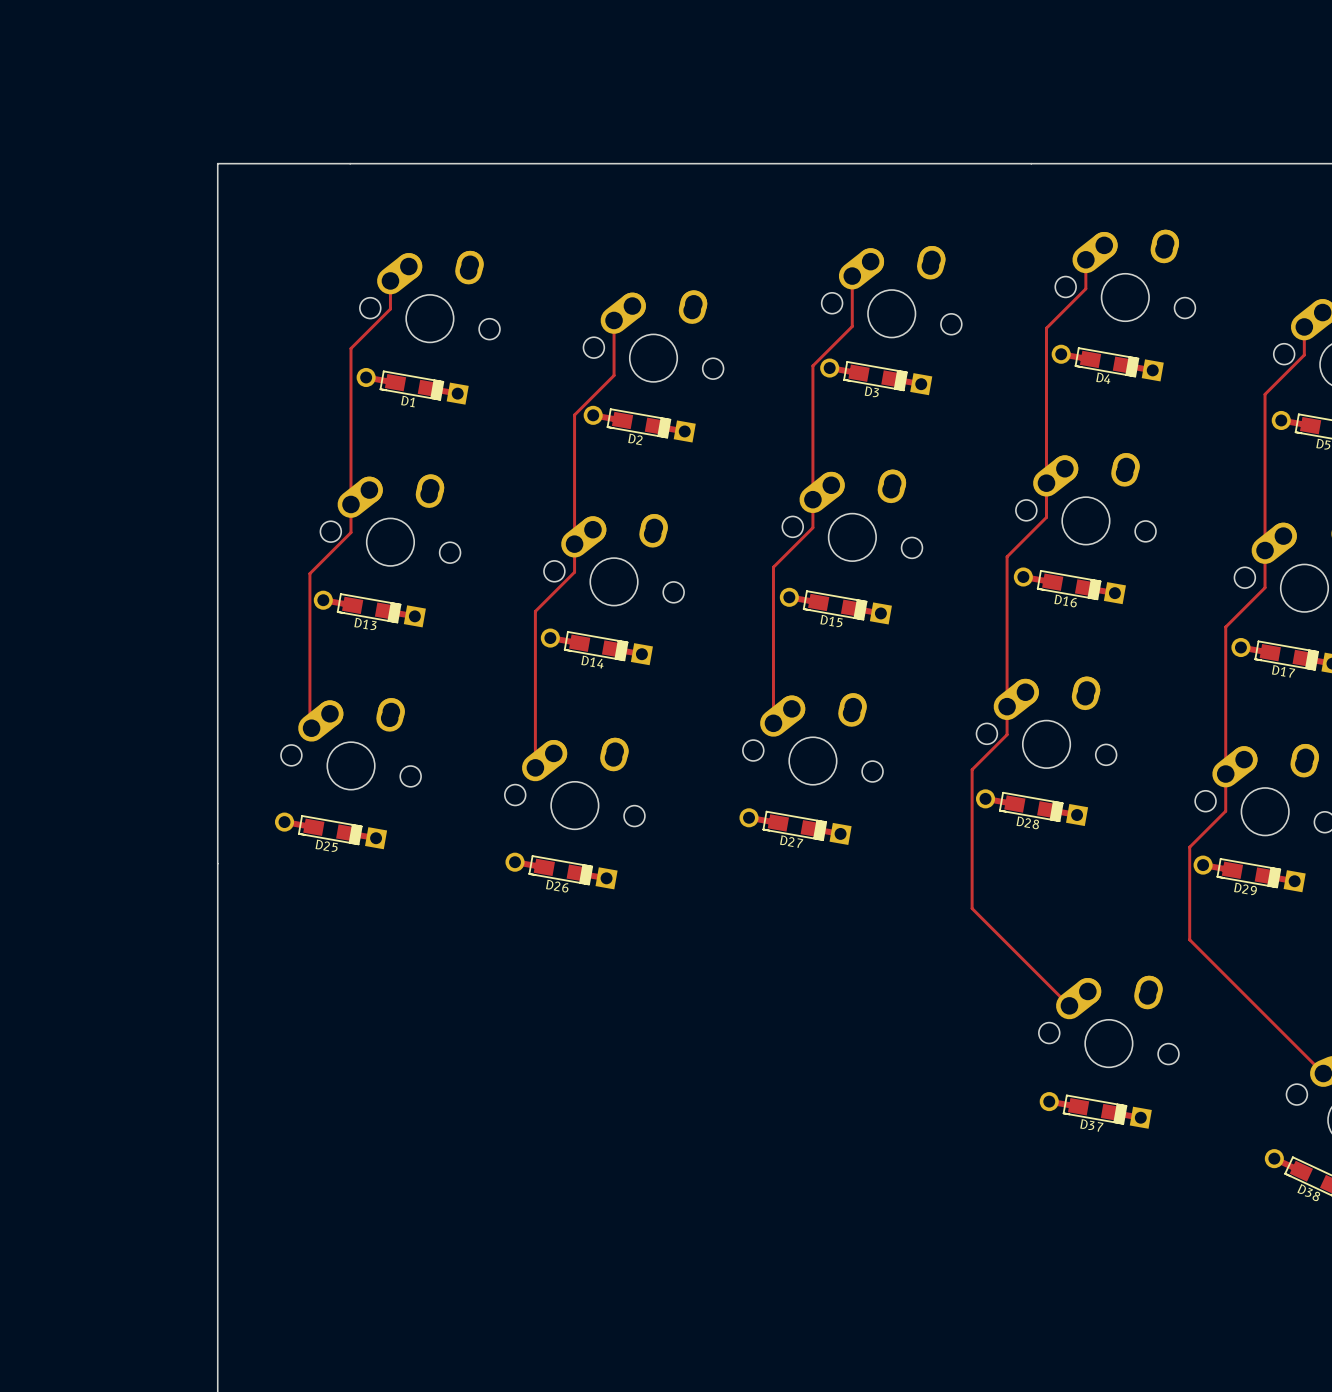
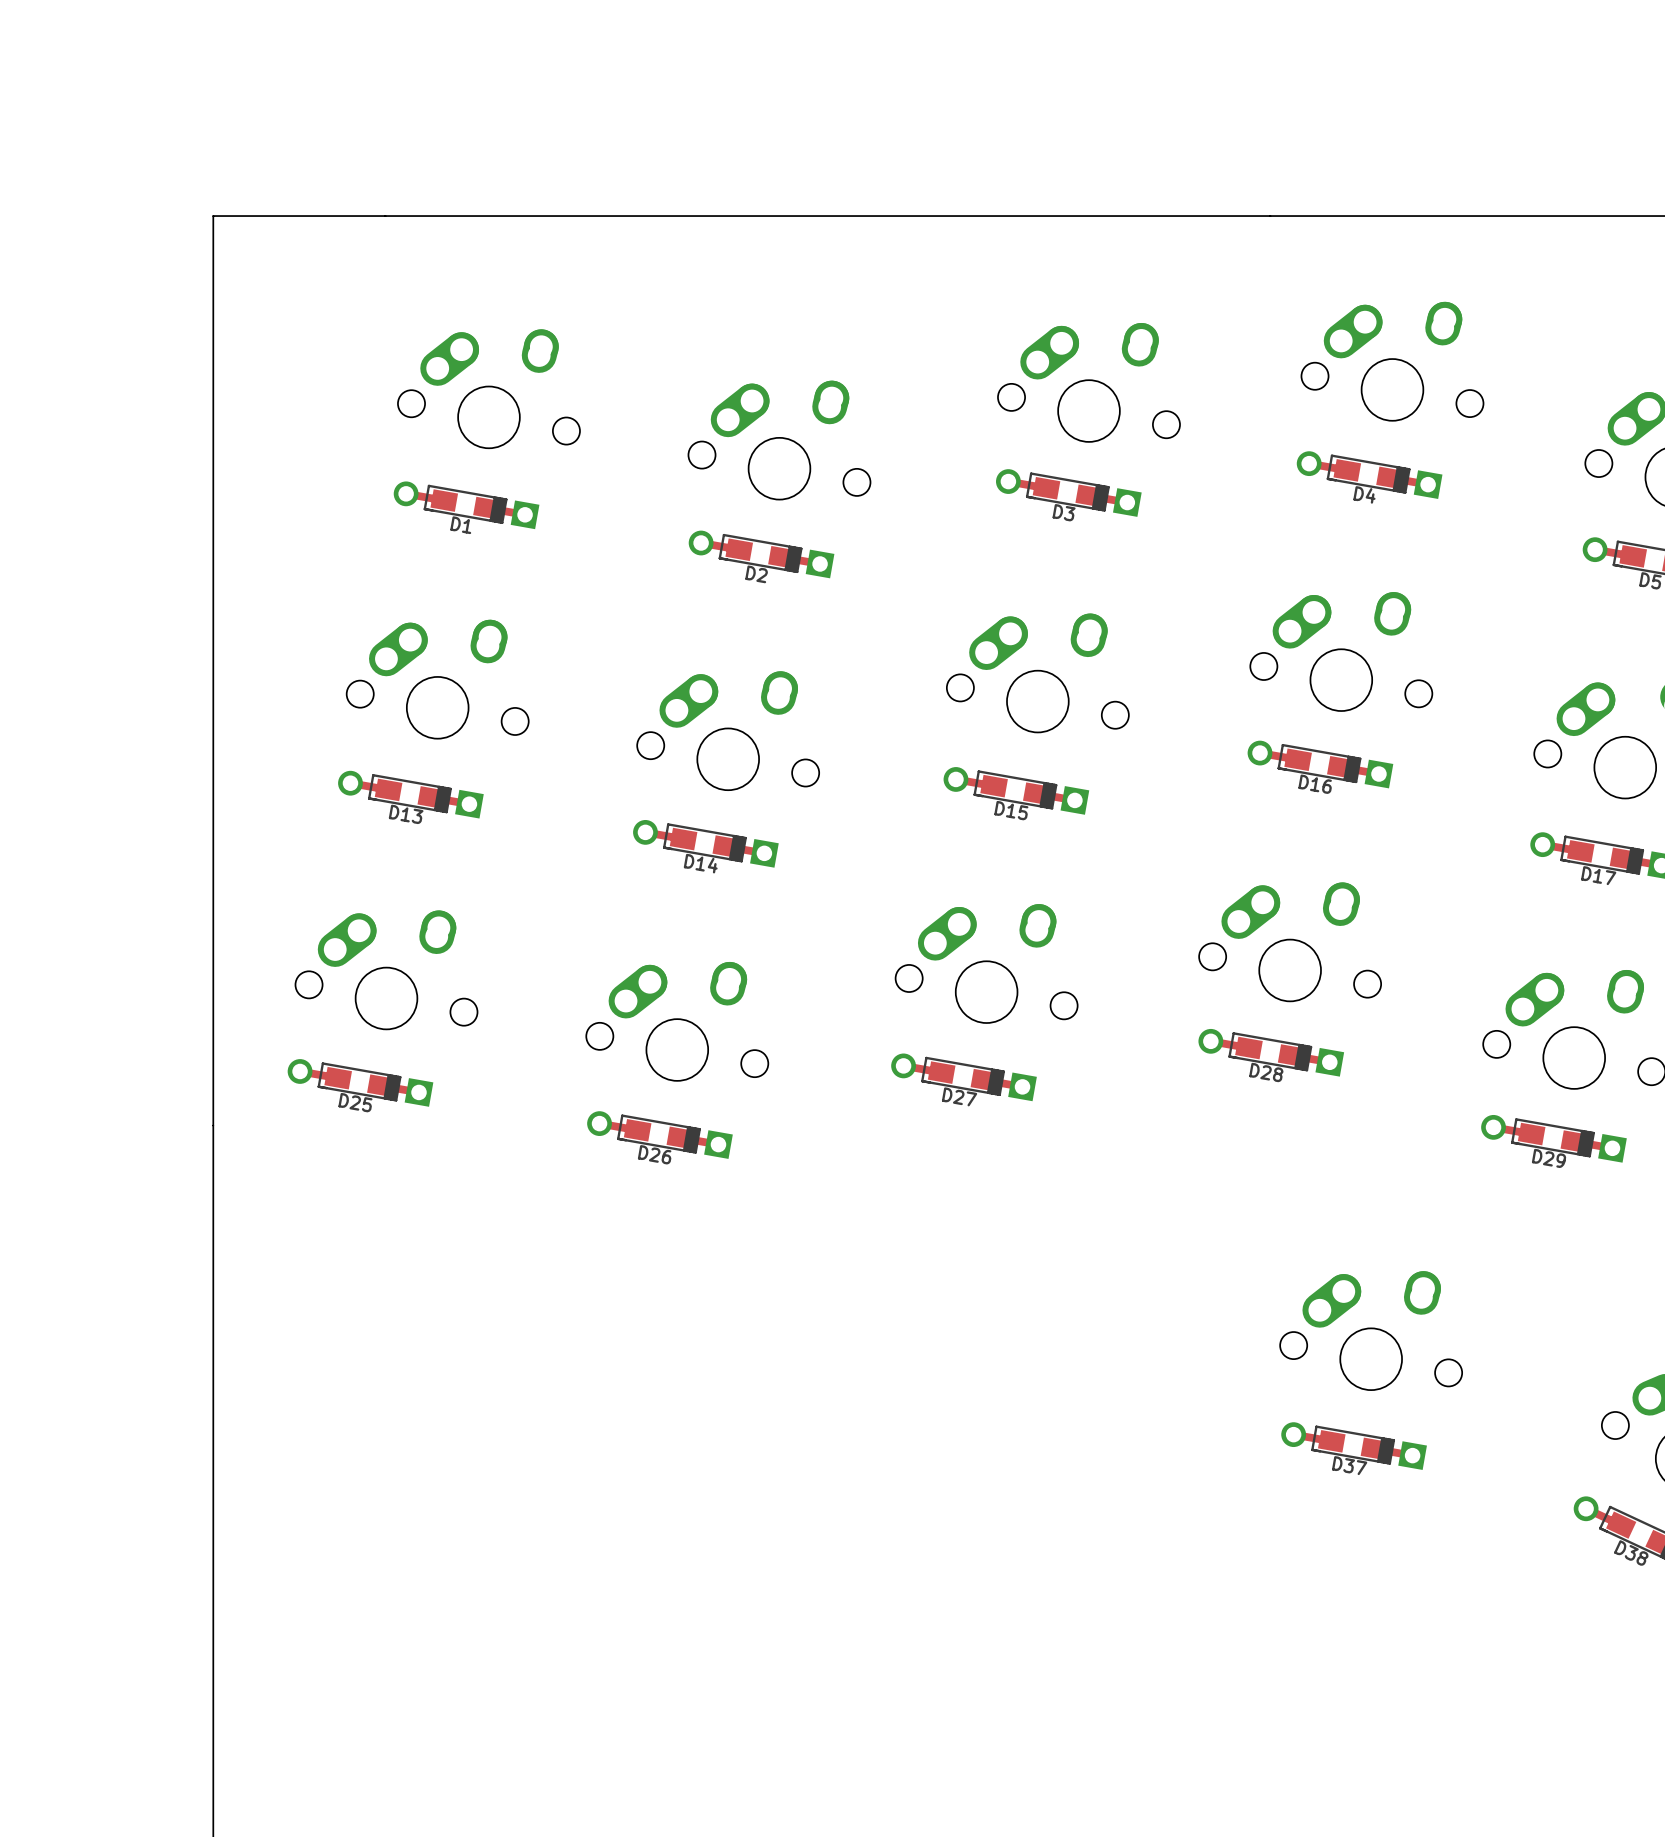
track: (1085, 259) (1085, 288) (1046, 328) (1046, 517) (1007, 556) (1007, 734) (972, 769) (972, 908) (1069, 1005) -> none
track: (852, 276) (852, 326) (812, 365) (812, 527) (773, 567) (773, 723) -> none
track: (390, 280) (390, 309) (350, 348) (350, 532) (309, 573) (309, 726) (311, 728) -> none
track: (614, 320) (614, 375) (574, 415) (574, 572) (535, 611) (535, 767) -> none
track: (1304, 326) (1304, 355) (1265, 394) (1265, 587) (1225, 627) (1225, 811) (1189, 847) (1189, 939) (1323, 1073) -> none

